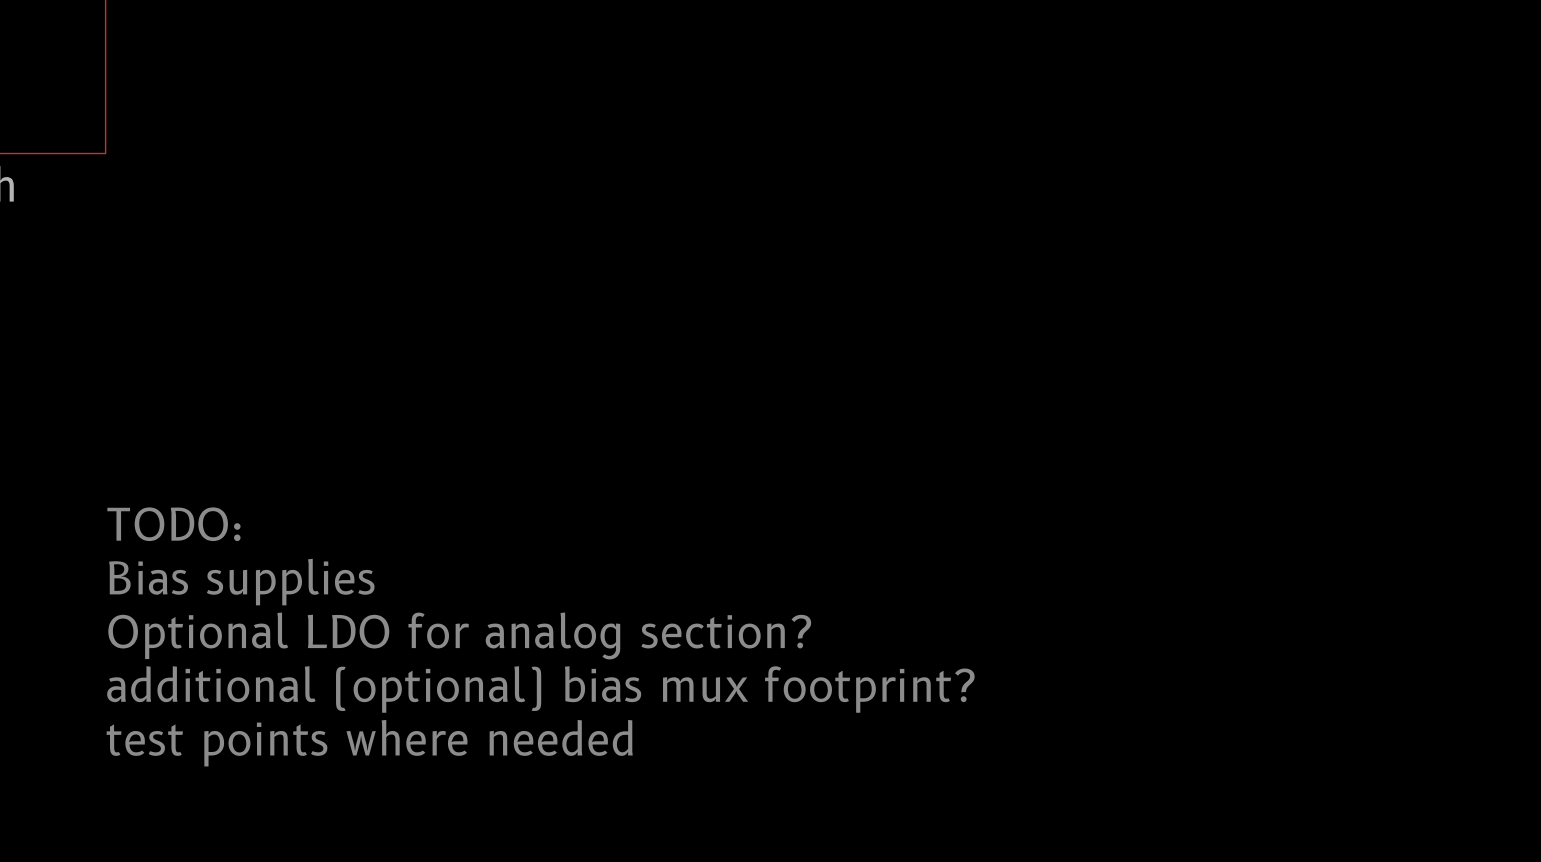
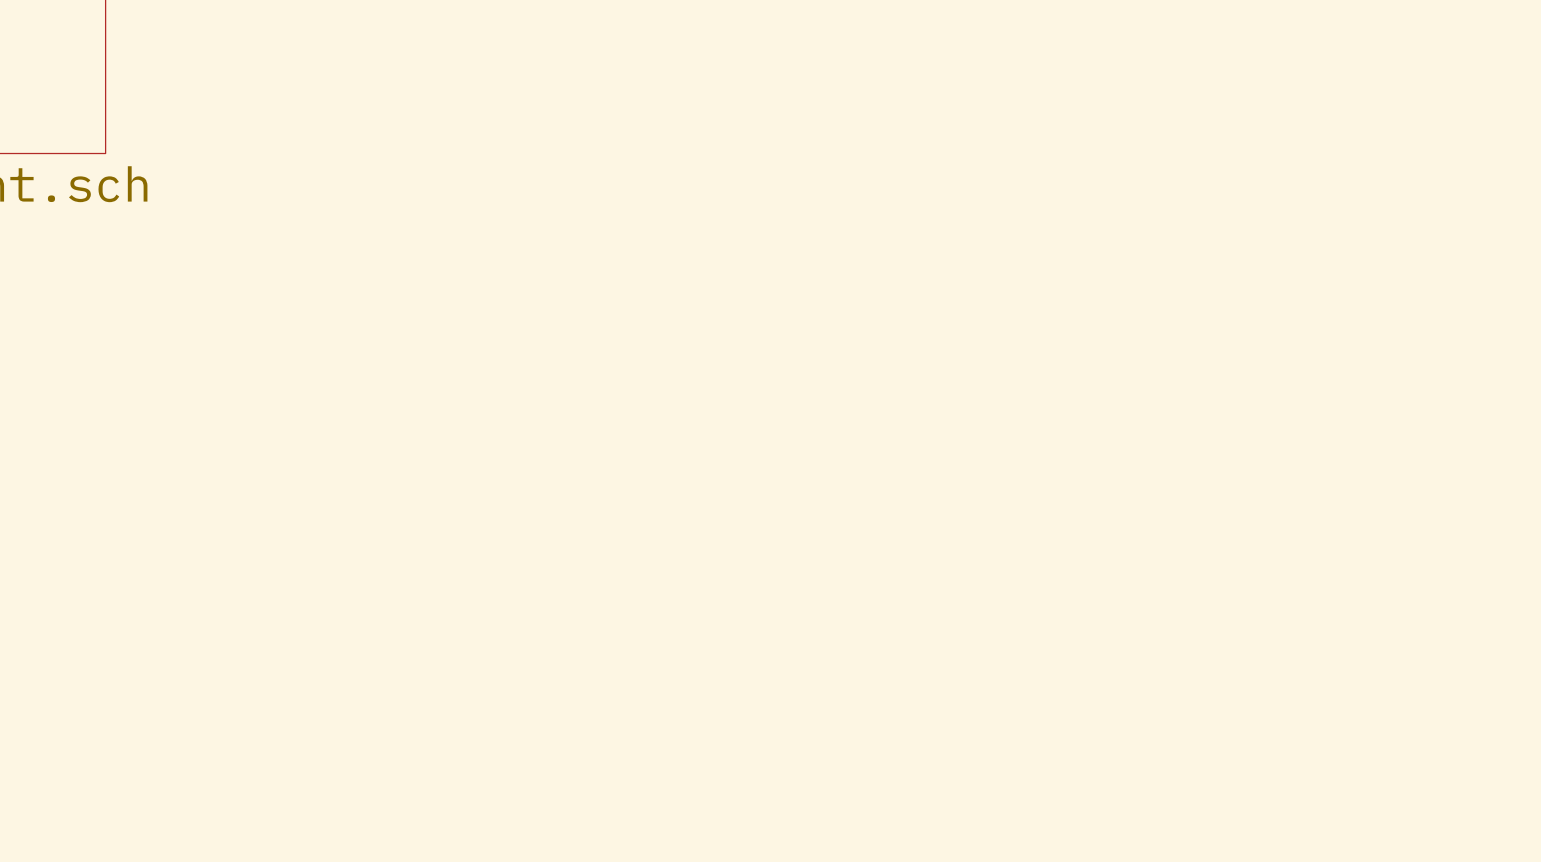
text: TODO: (173, 524) -> none
text: Bias supplies (241, 582) -> none
text: Optional LDO for analog section? (459, 635) -> none
text: additional (optional) bias mux footprint? (540, 689) -> none
text: test points where needed (369, 743) -> none

